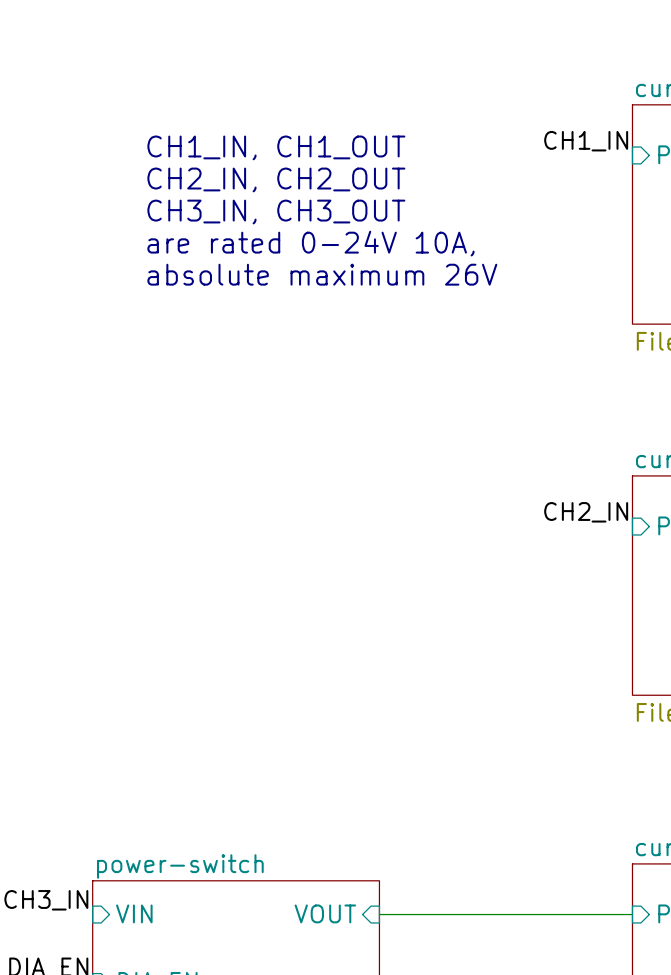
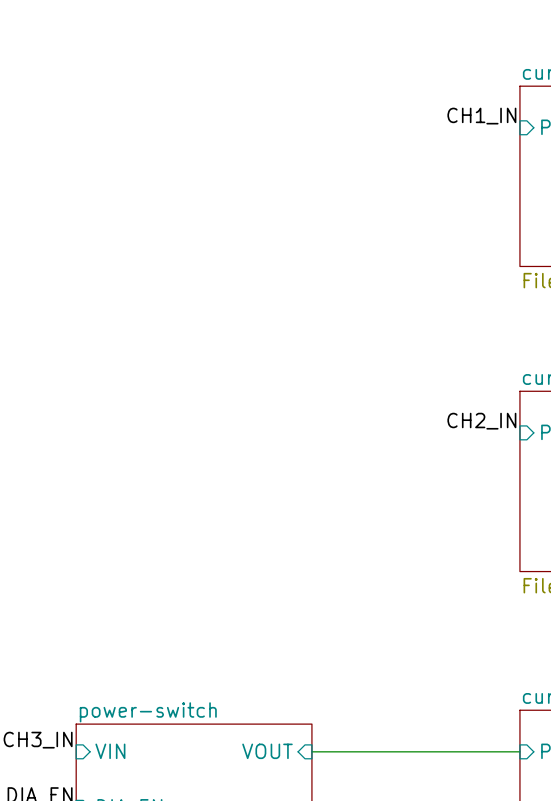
text: CH1_IN, CH1_OUT (276, 147) -> none
text: CH2_IN, CH2_OUT (276, 179) -> none
text: CH3_IN, CH3_OUT (276, 212) -> none
text: are rated 0-24V 10A, (310, 243) -> none
text: absolute maximum 26V (322, 274) -> none

